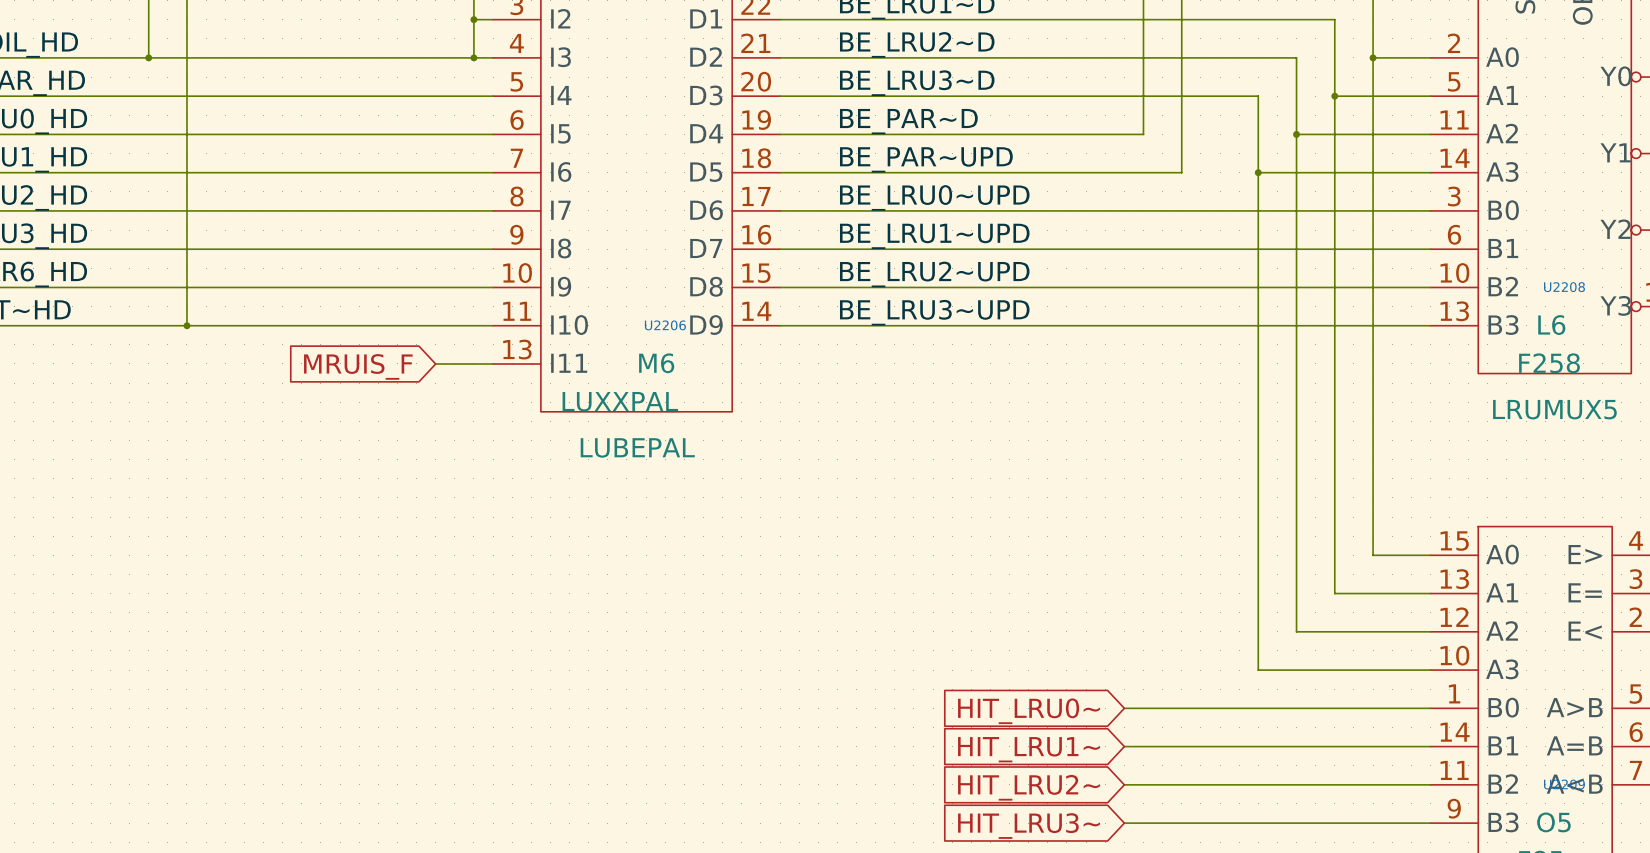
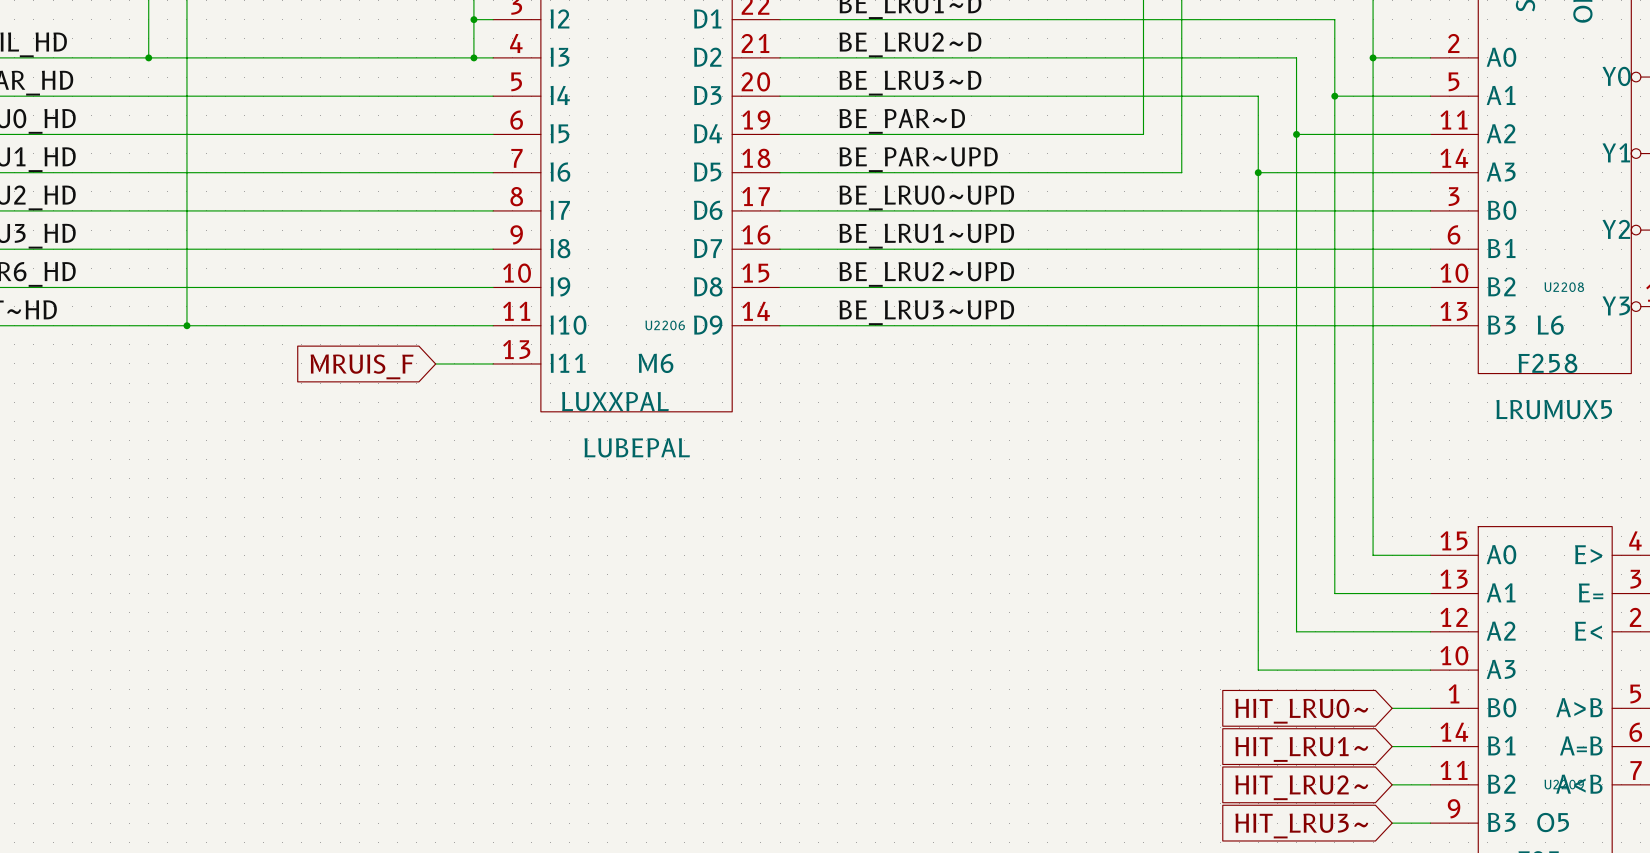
wire: (1124, 708) (1392, 708) -> none
global label: HIT_LRU0~ (1029, 711) -> none
global label: none -> HIT_LRU0~ (1301, 711)
wire: (1124, 746) (1392, 746) -> none
global label: HIT_LRU1~ (1029, 749) -> none
global label: none -> HIT_LRU1~ (1301, 749)
wire: (1124, 784) (1392, 784) -> none
global label: HIT_LRU2~ (1029, 787) -> none
global label: none -> HIT_LRU2~ (1301, 787)
wire: (1124, 823) (1392, 823) -> none
global label: HIT_LRU3~ (1029, 826) -> none
global label: none -> HIT_LRU3~ (1301, 825)

